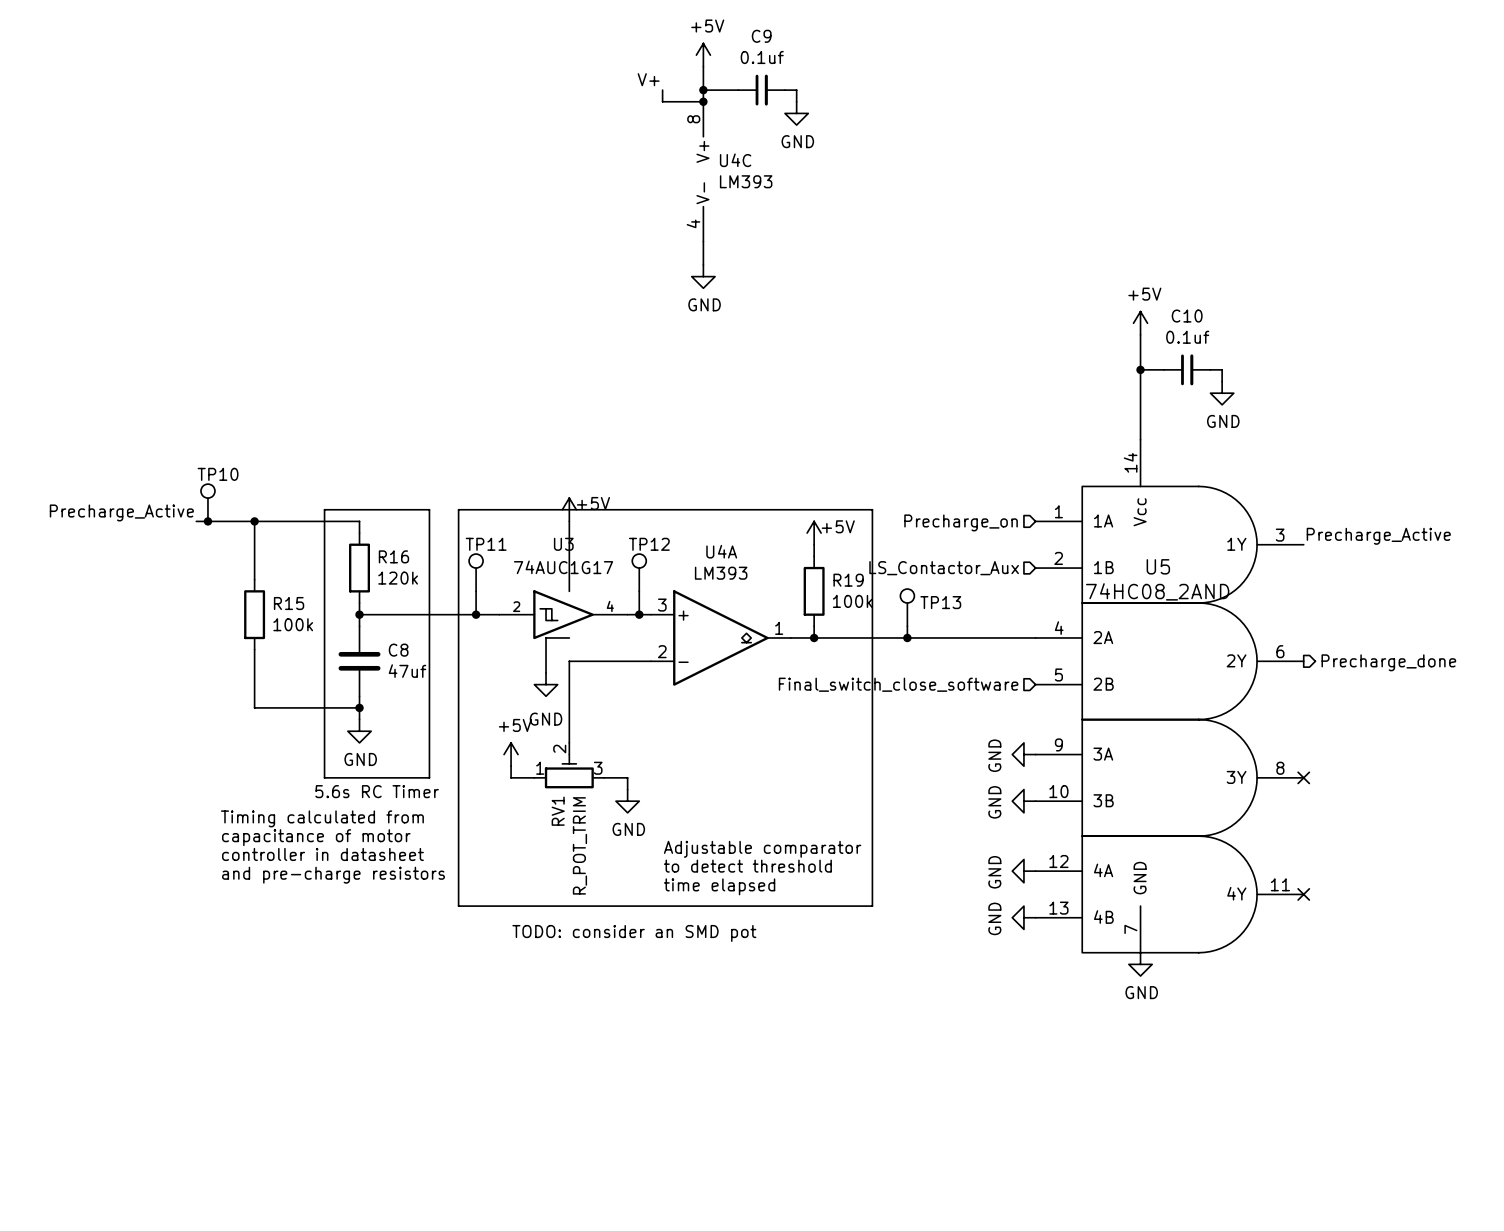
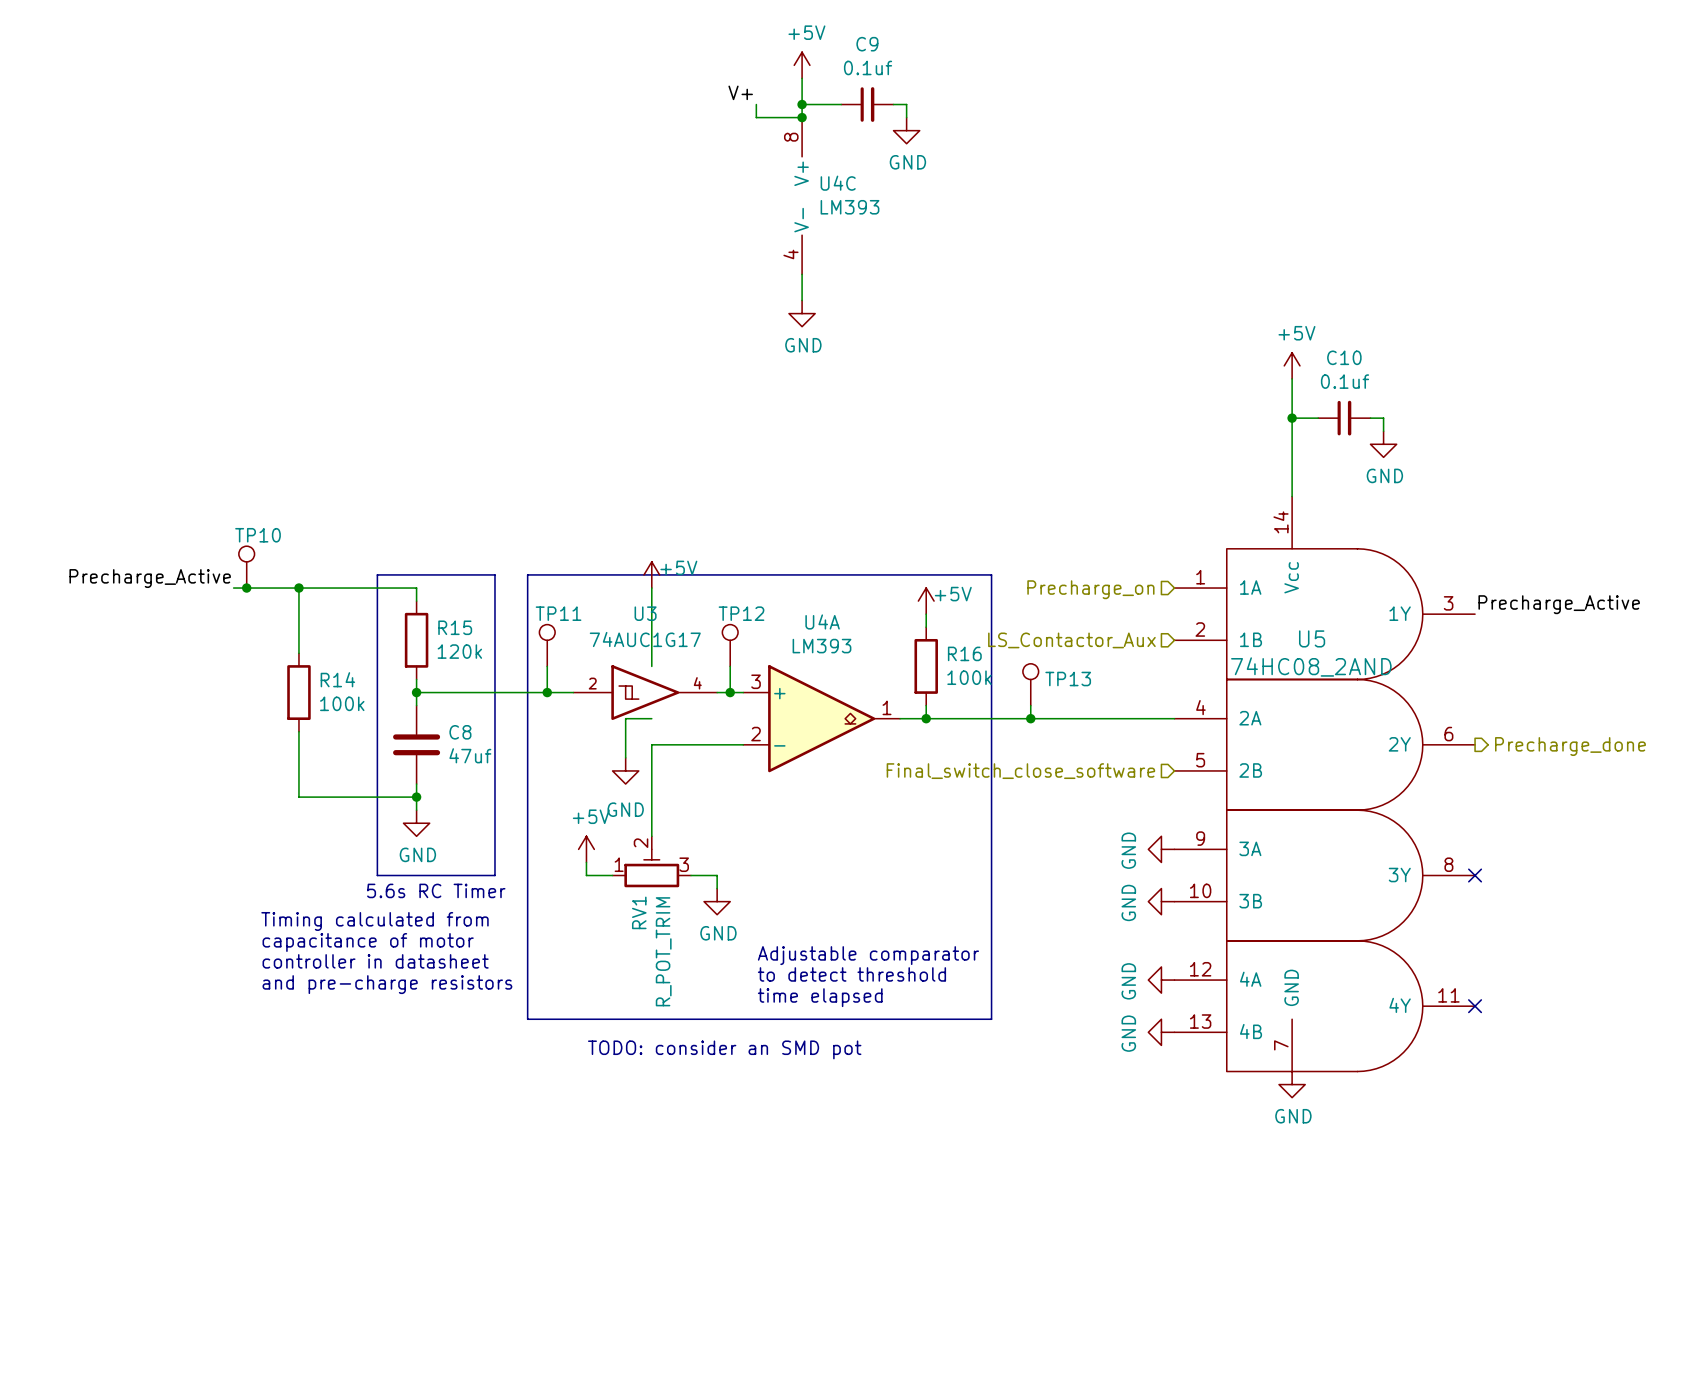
R16 name: R16 (393, 556) -> R15 (455, 627)
R19 name: R19 (848, 580) -> R16 (964, 653)
R15 name: R15 (289, 603) -> R14 (337, 679)

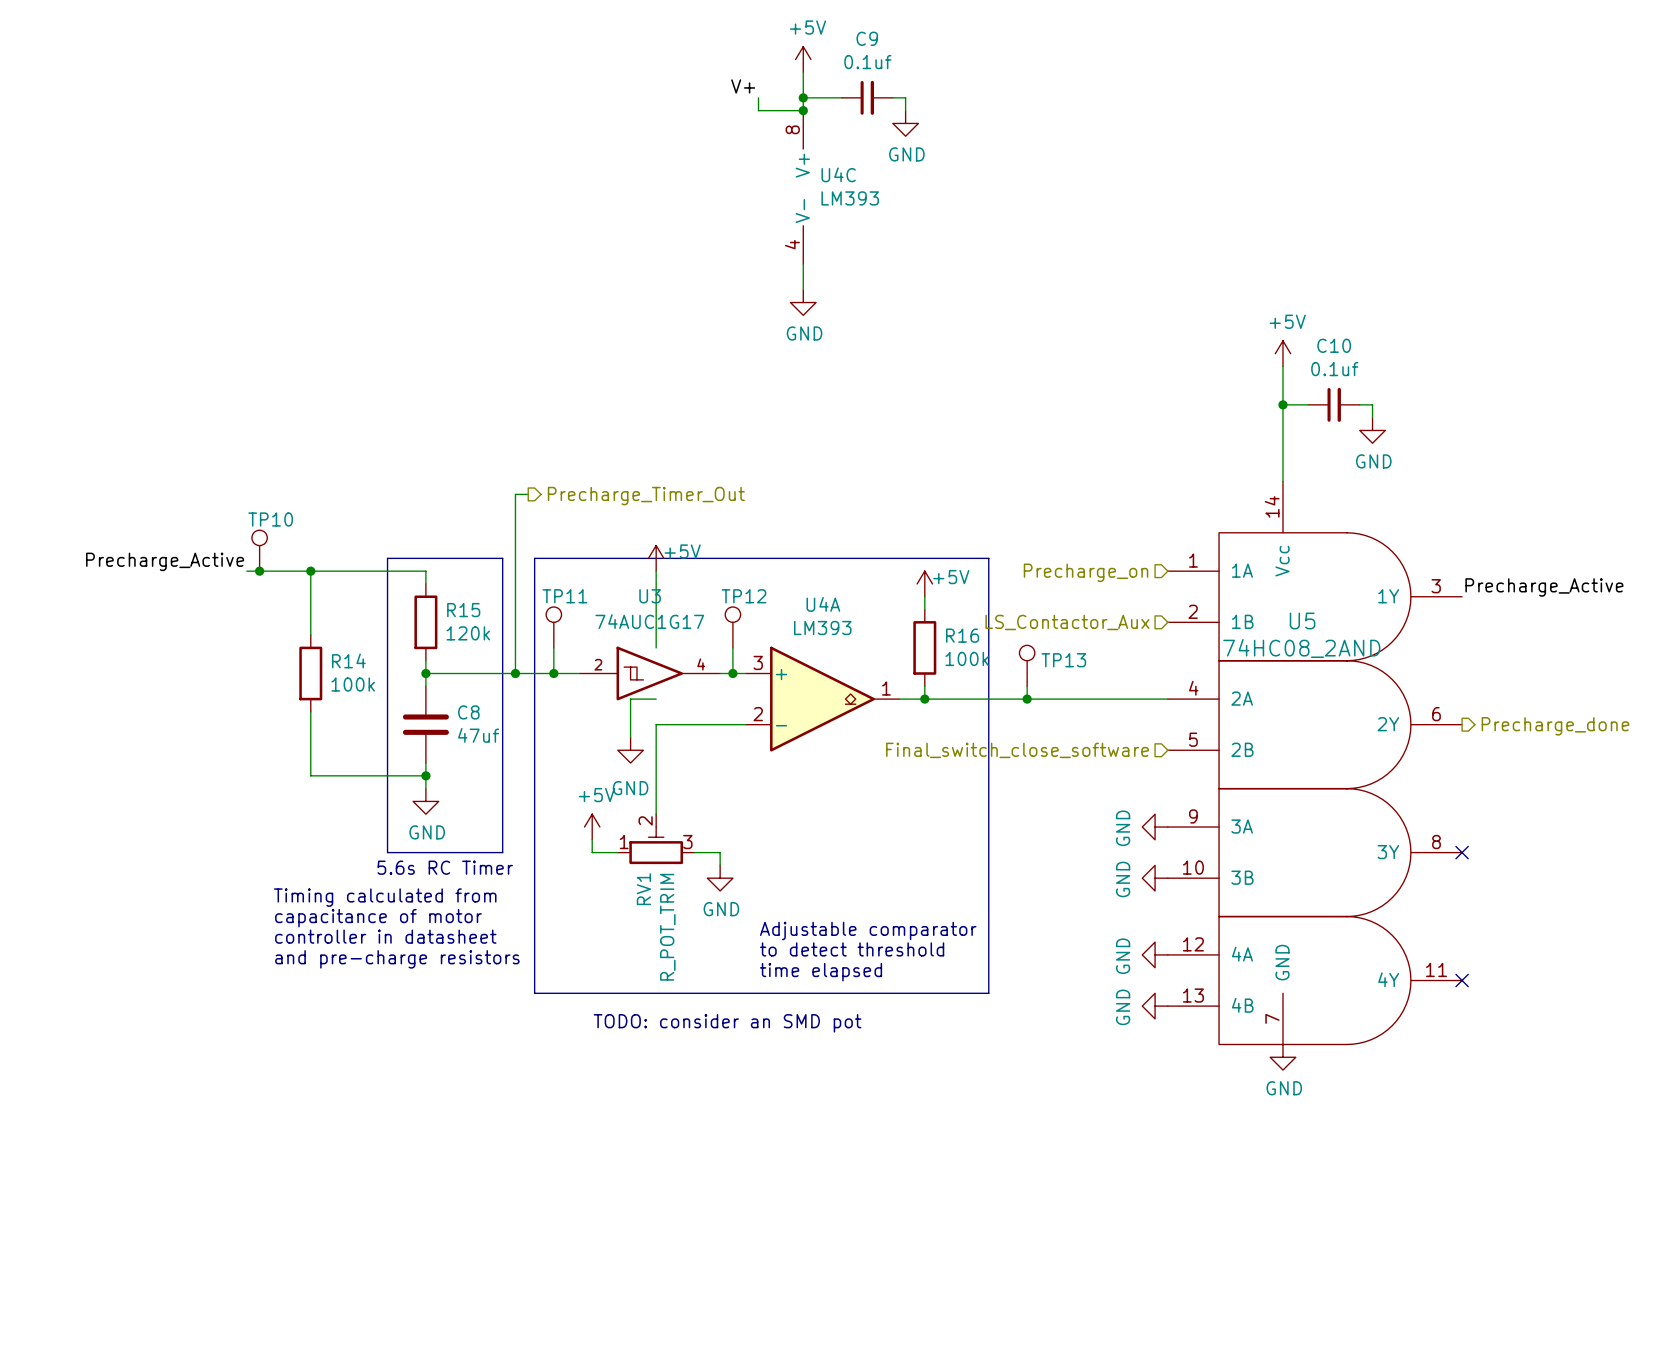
wire: none -> (528, 494) (515, 494) (515, 673)
hierarchical label: none -> Precharge_Timer_Out (646, 496)
junction: none -> (515, 673)

